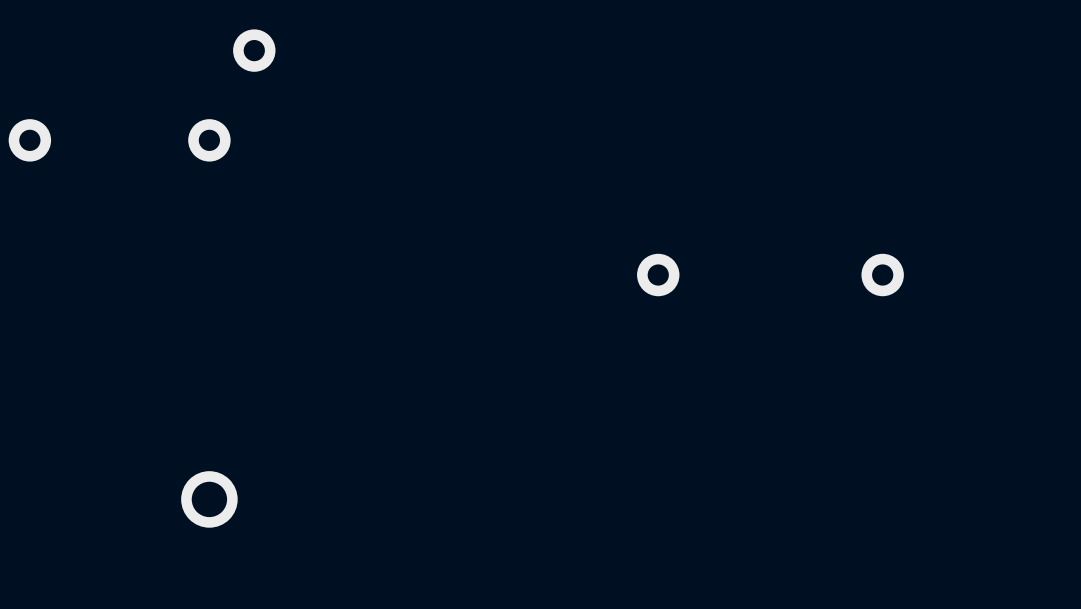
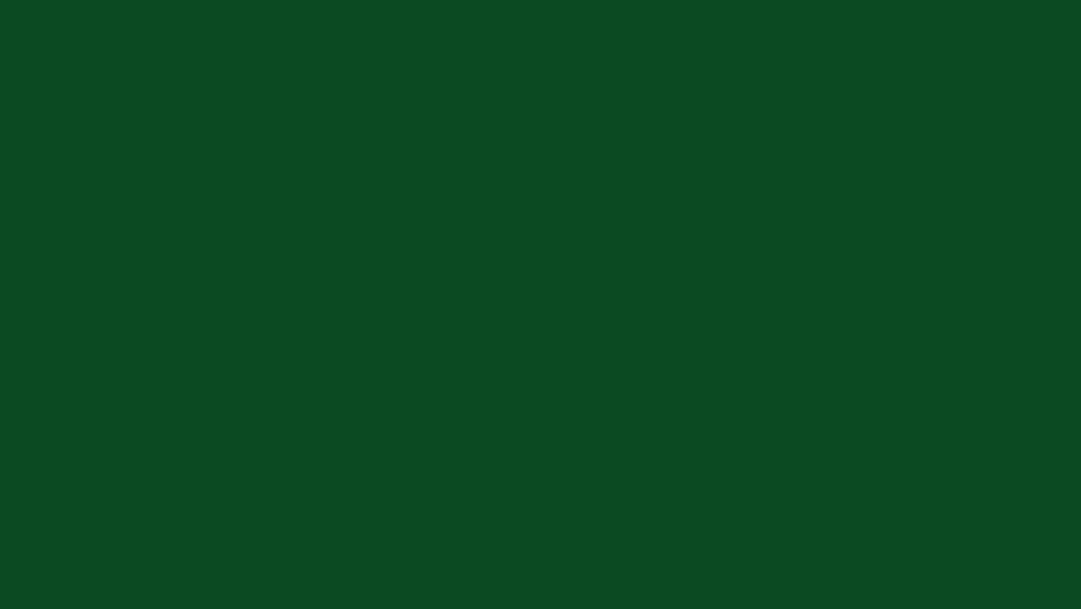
via: (254, 50) -> none
via: (29, 140) -> none
via: (209, 140) -> none
via: (658, 275) -> none
via: (882, 275) -> none
via: (209, 499) -> none

